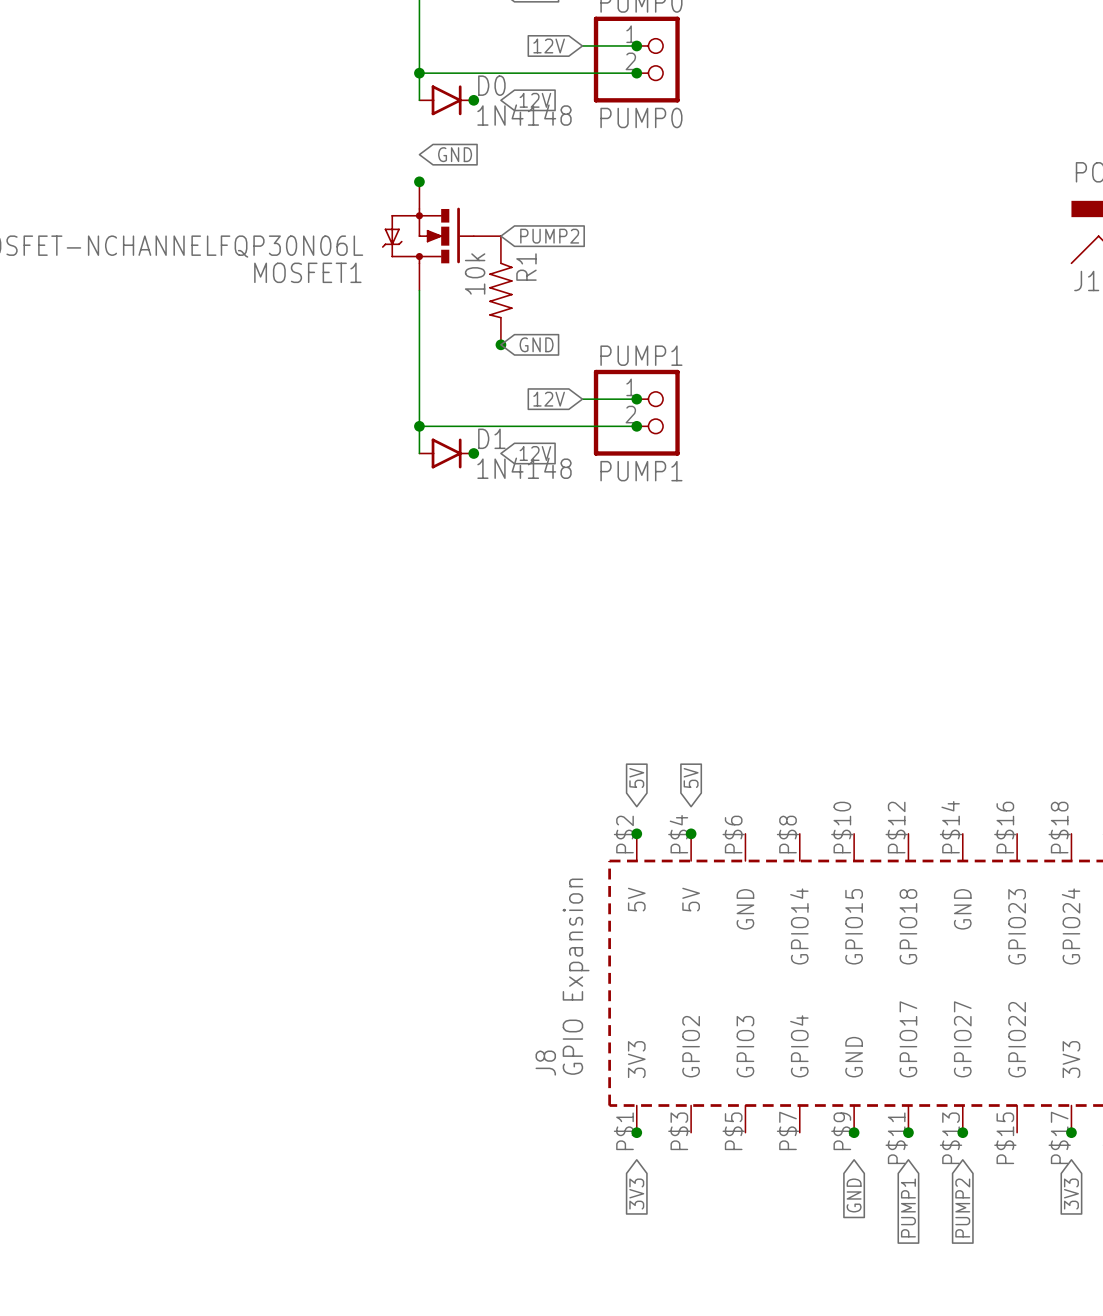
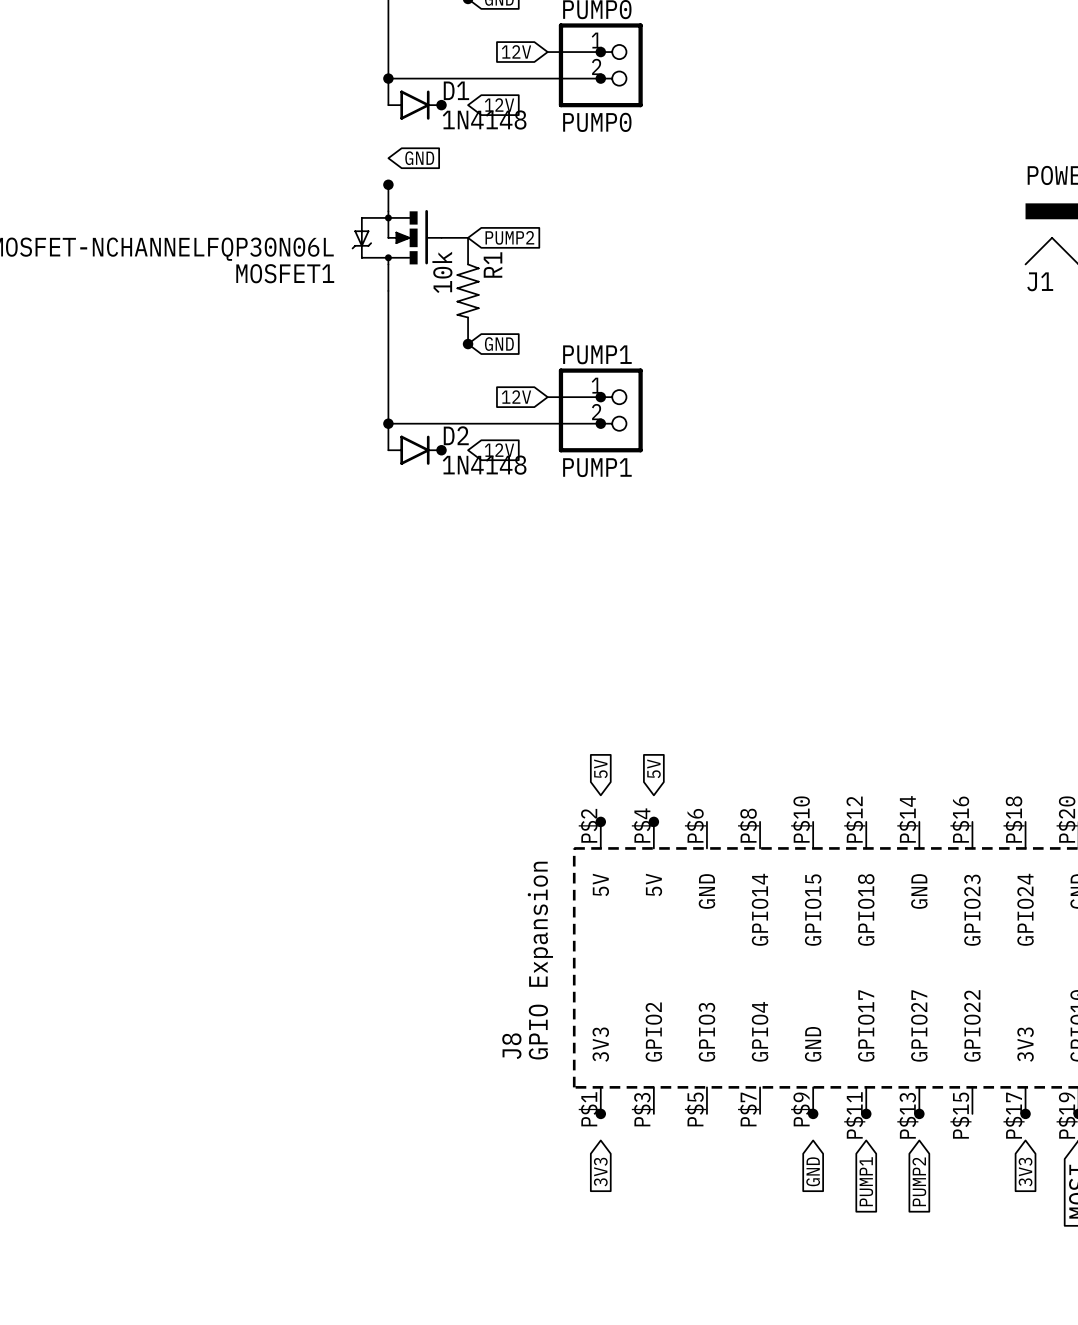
D0 name: D0 (491, 85) -> D1 (456, 90)
D1 name: D1 (491, 438) -> D2 (456, 435)

